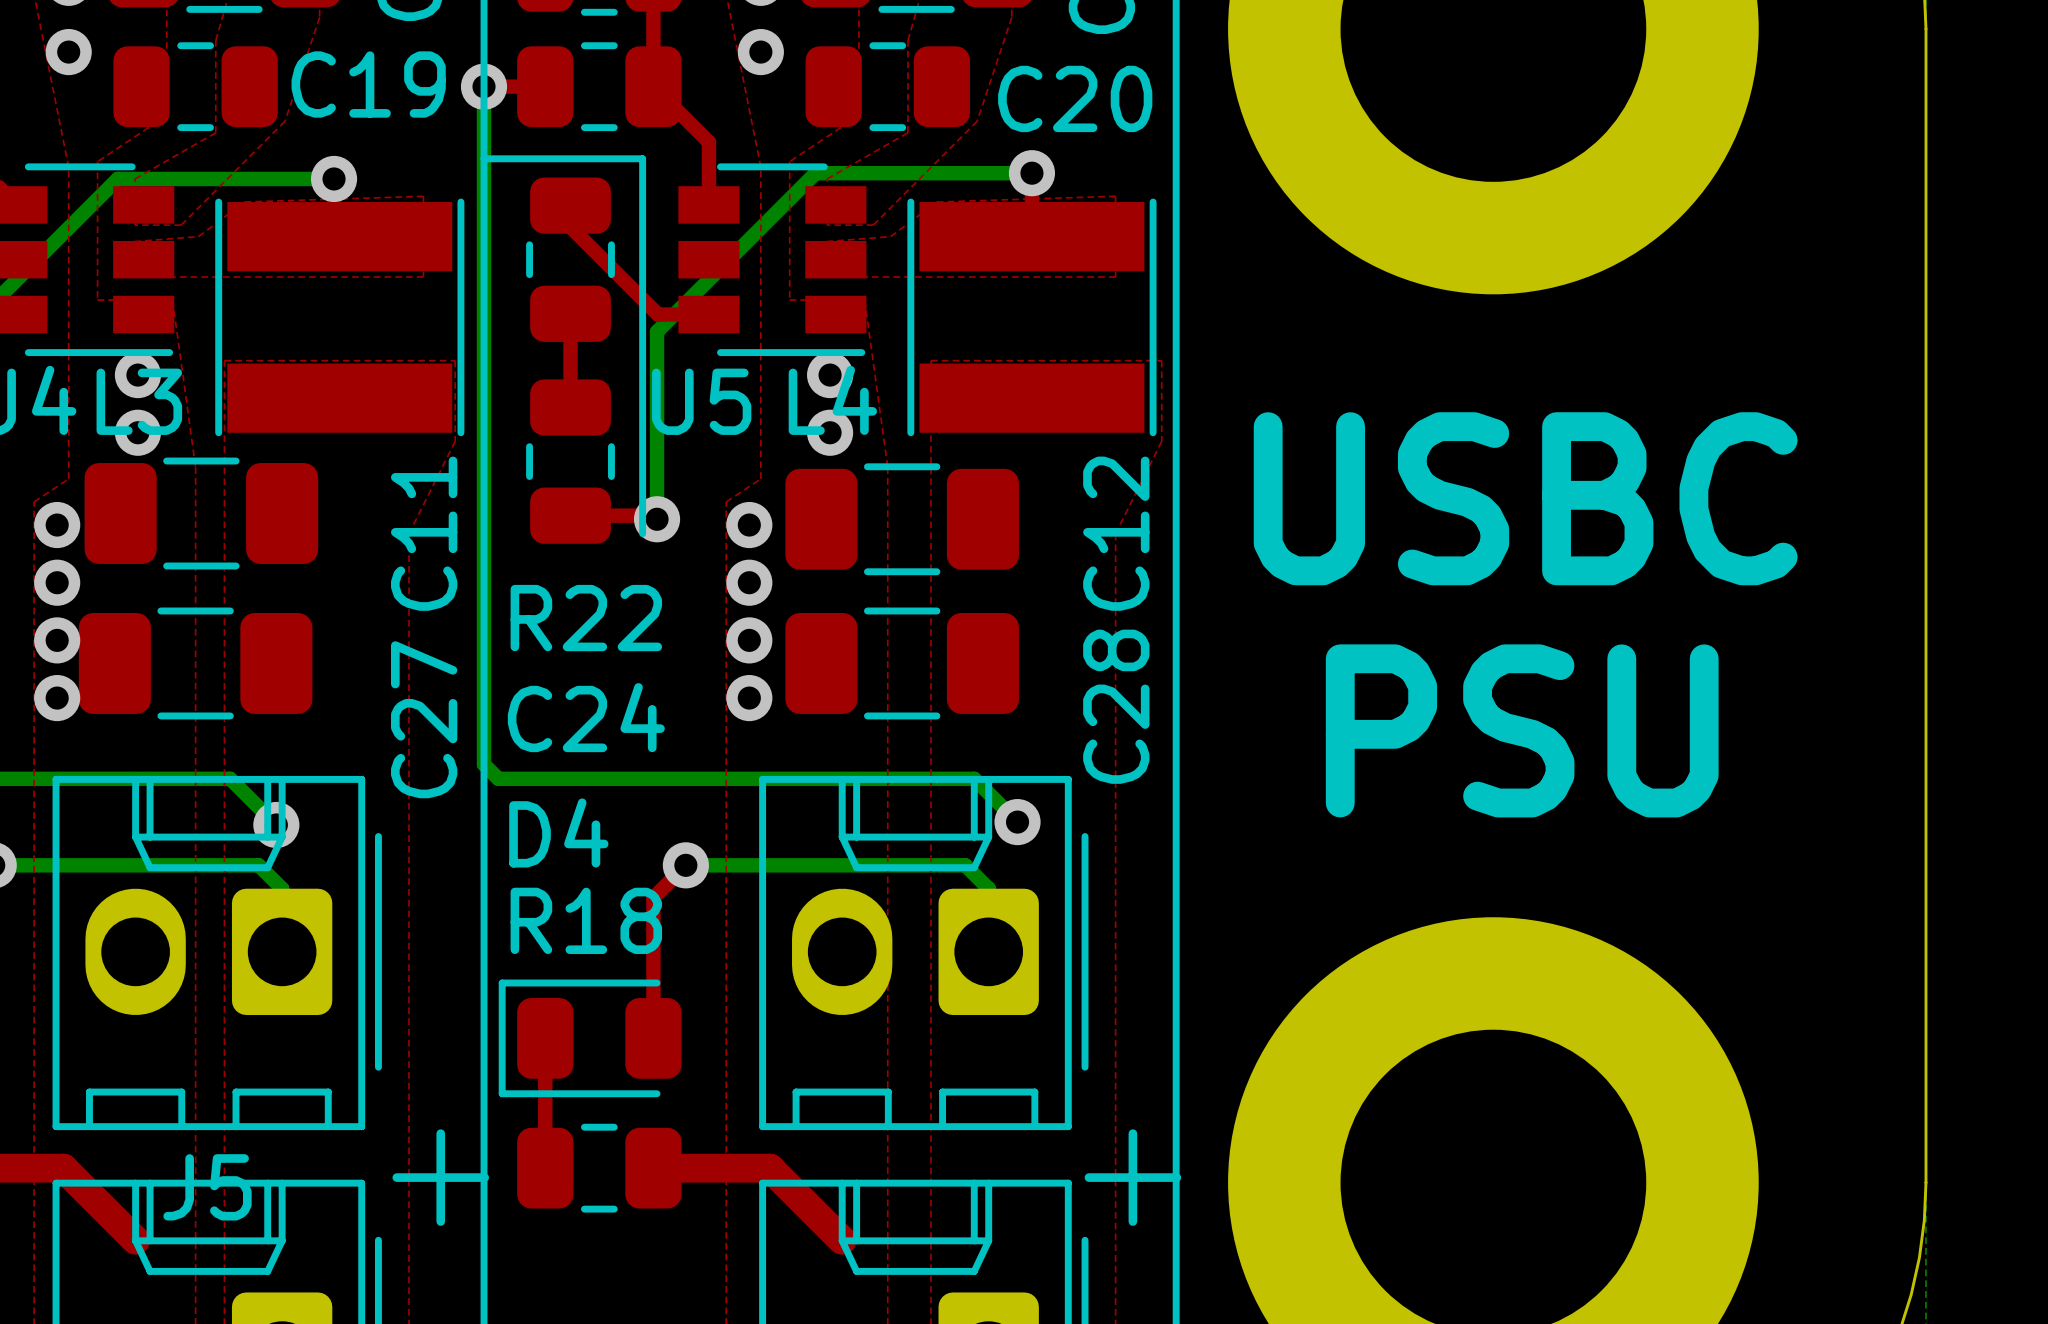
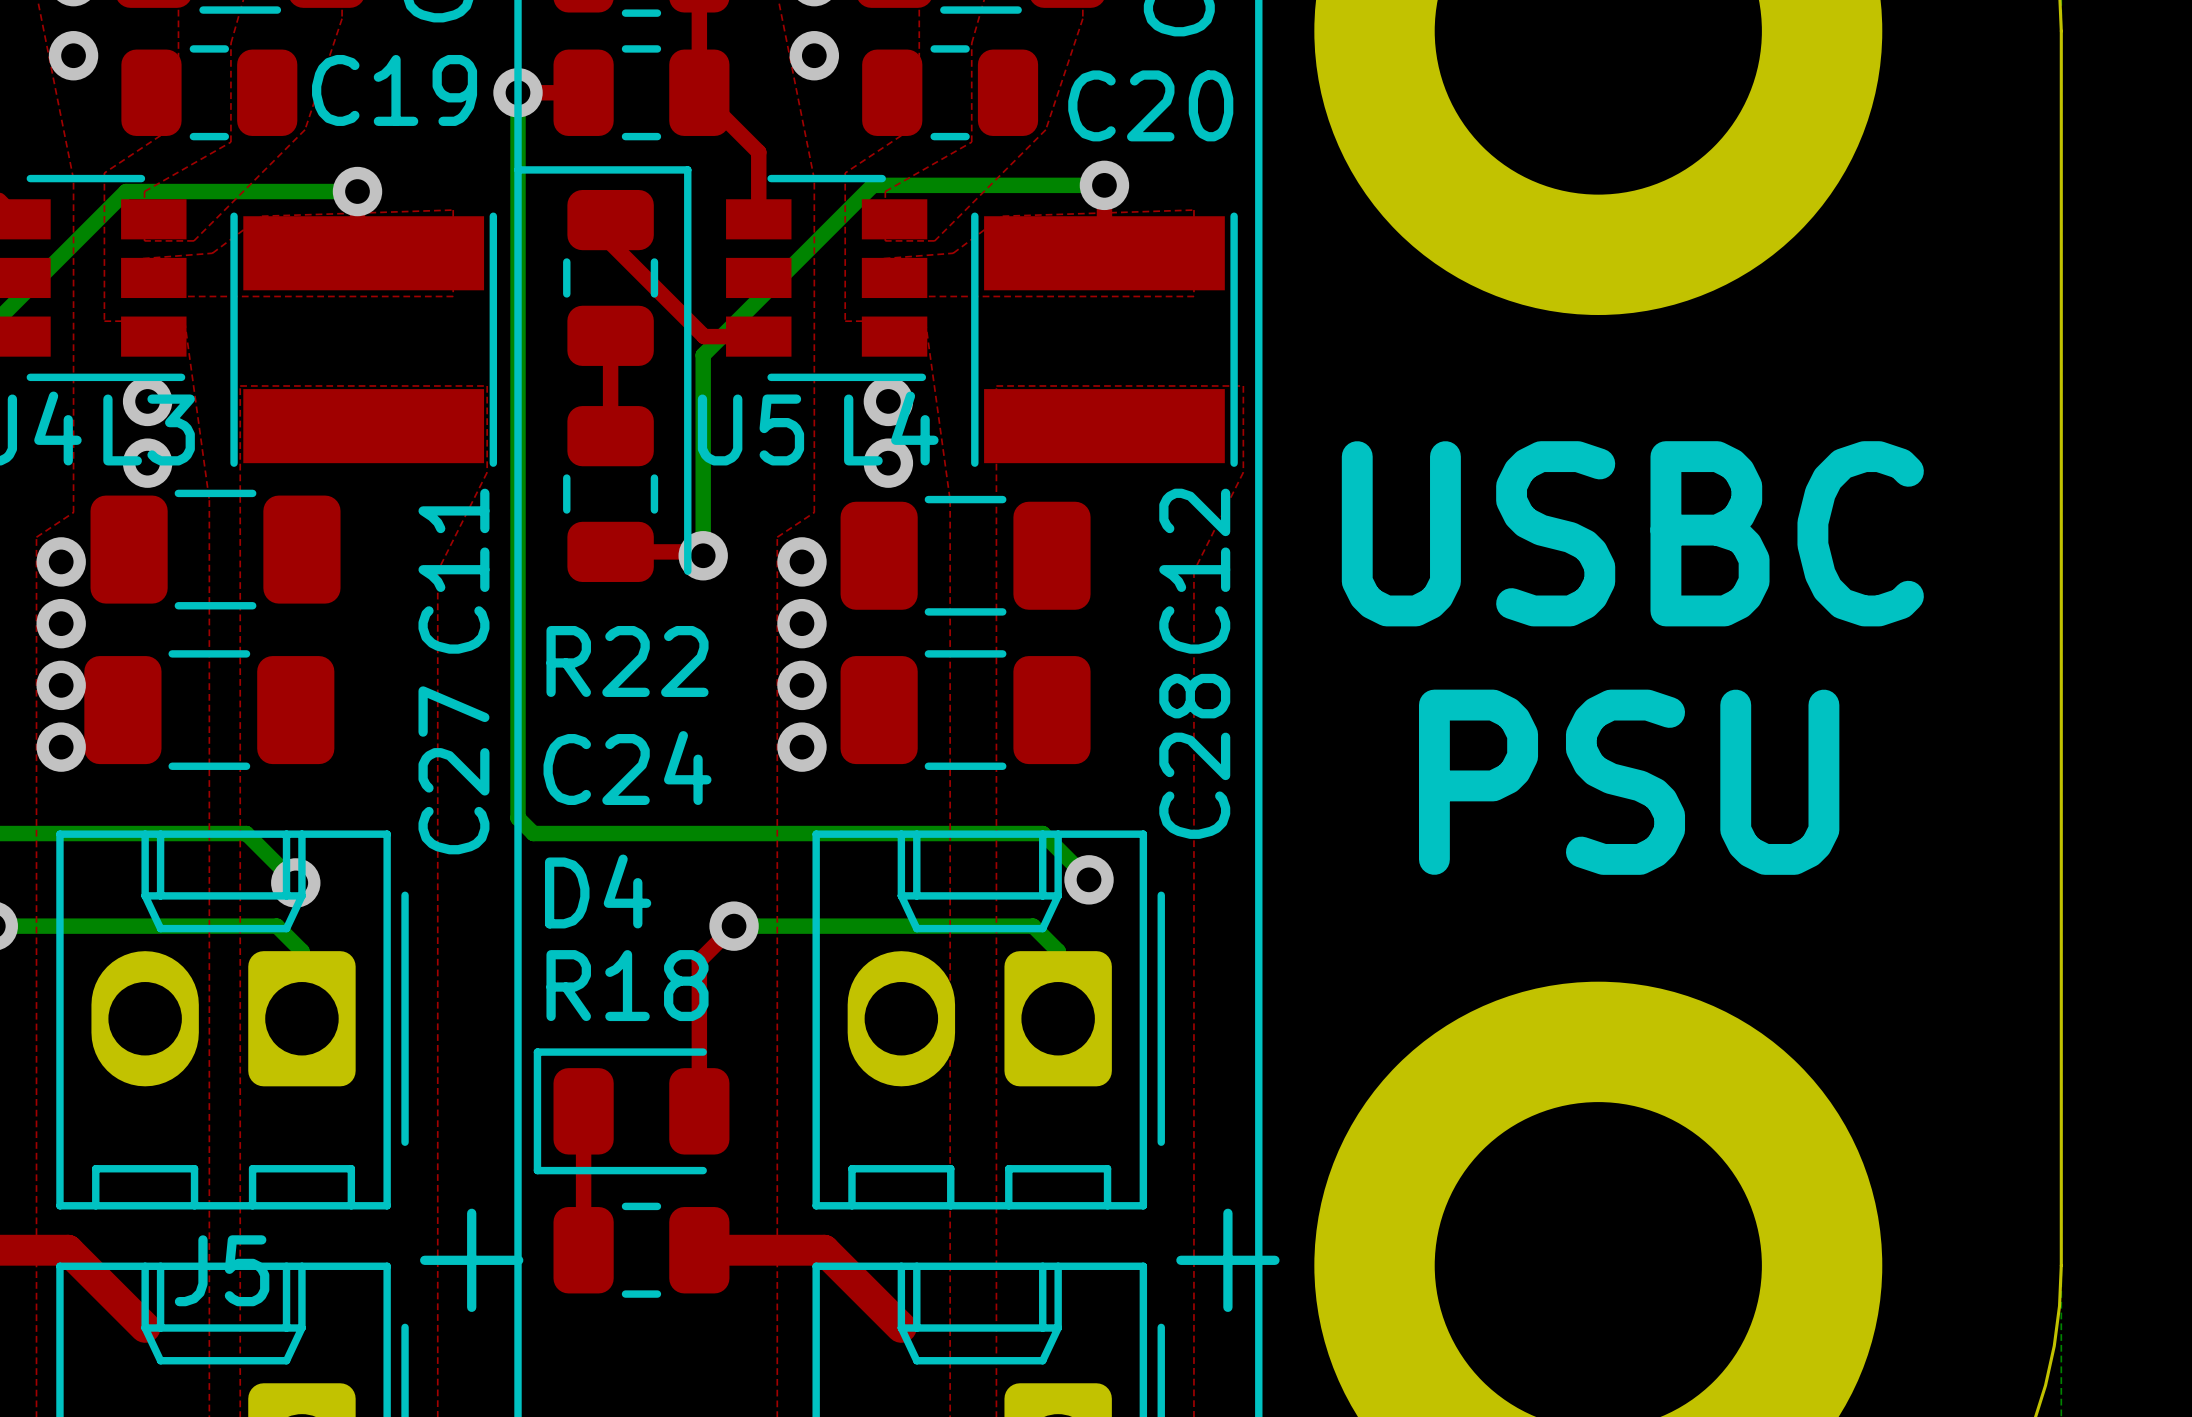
text position: + (1132, 1177) -> + (1227, 1260)

